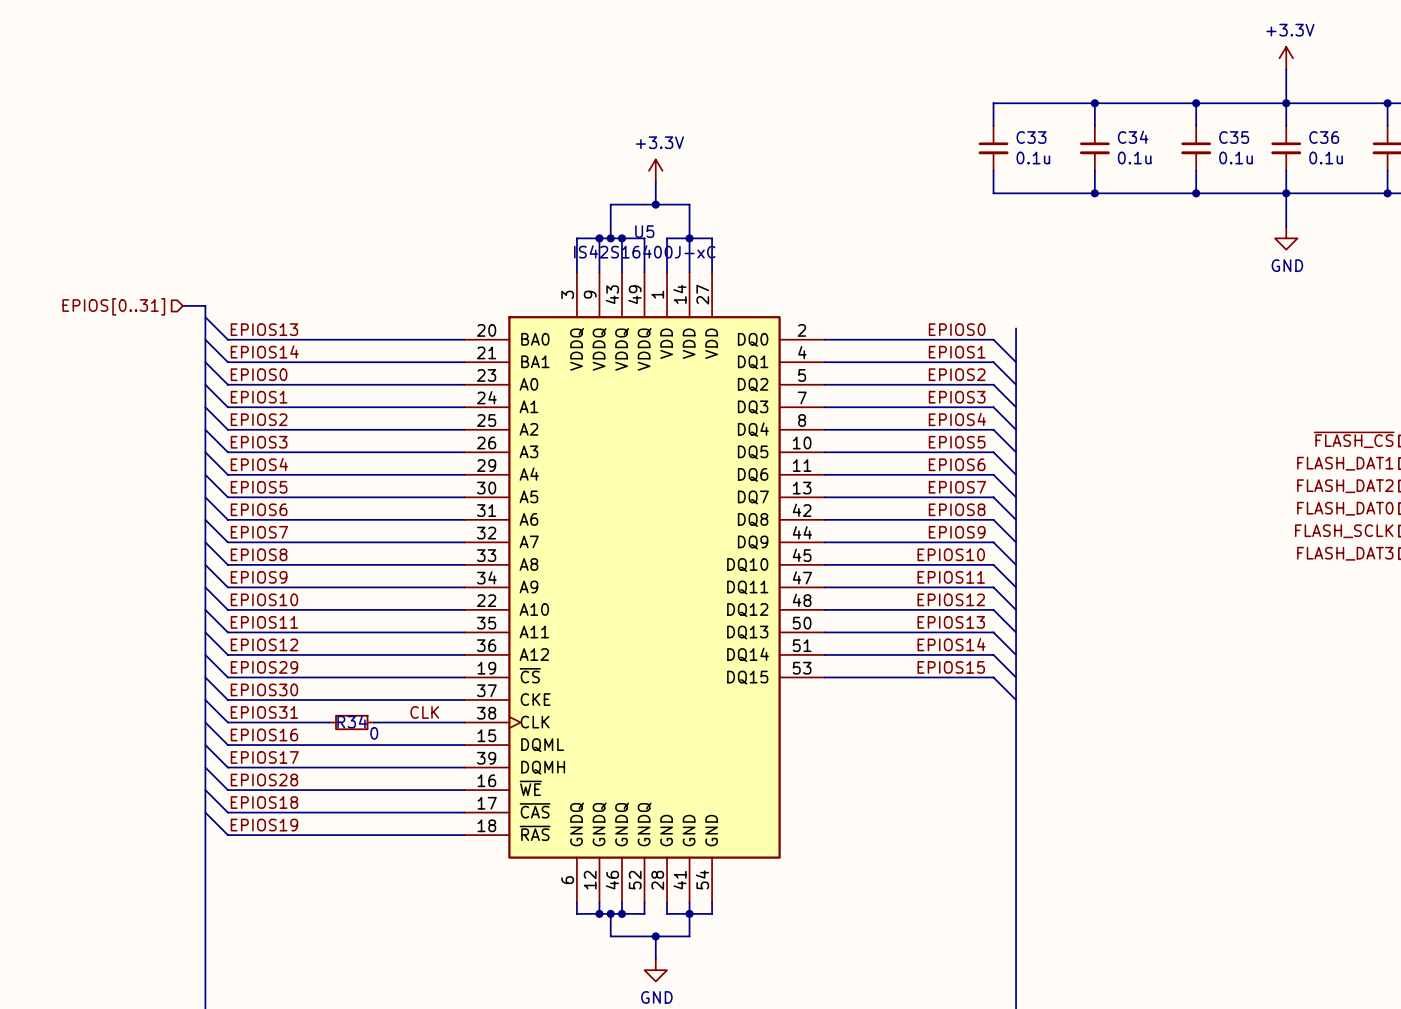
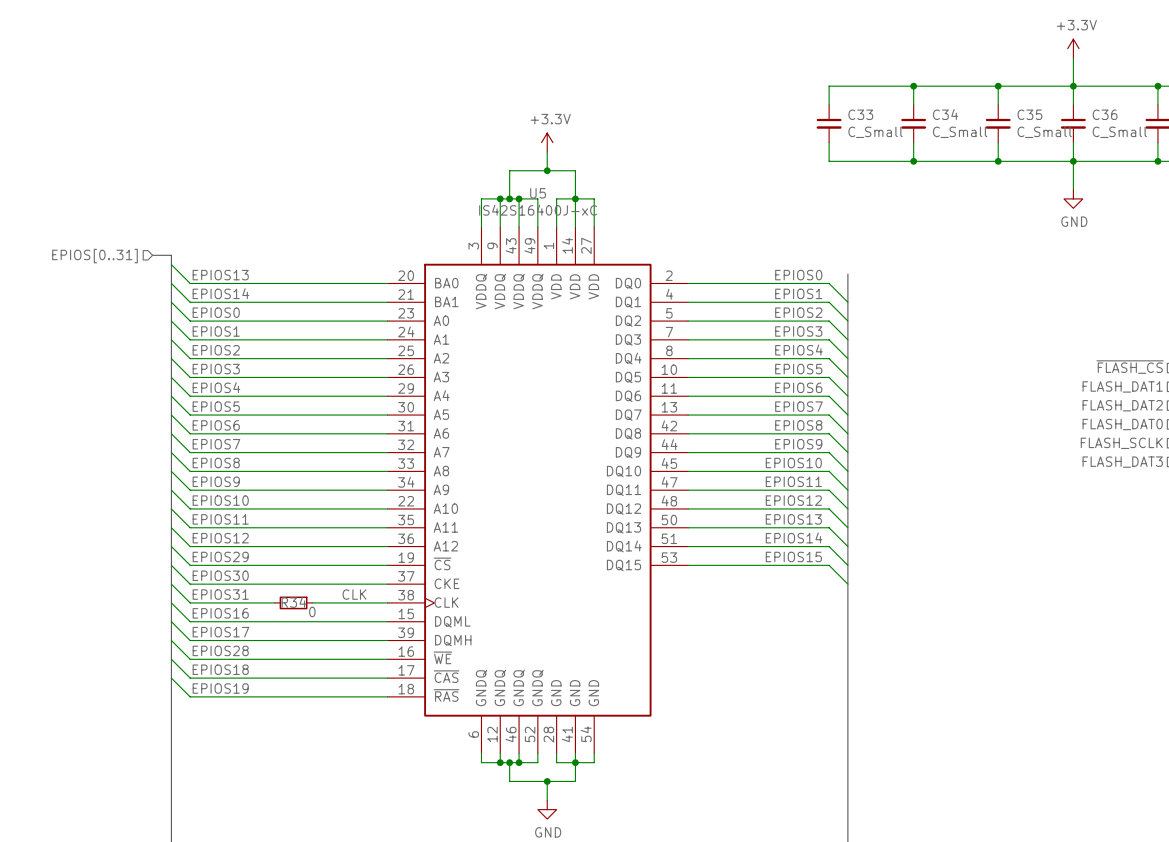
C33 value: 0.1u (1033, 158) -> C_Small (875, 132)
C34 value: 0.1u (1134, 158) -> C_Small (960, 132)
C35 value: 0.1u (1236, 158) -> C_Small (1044, 132)
C36 value: 0.1u (1326, 158) -> C_Small (1119, 132)

